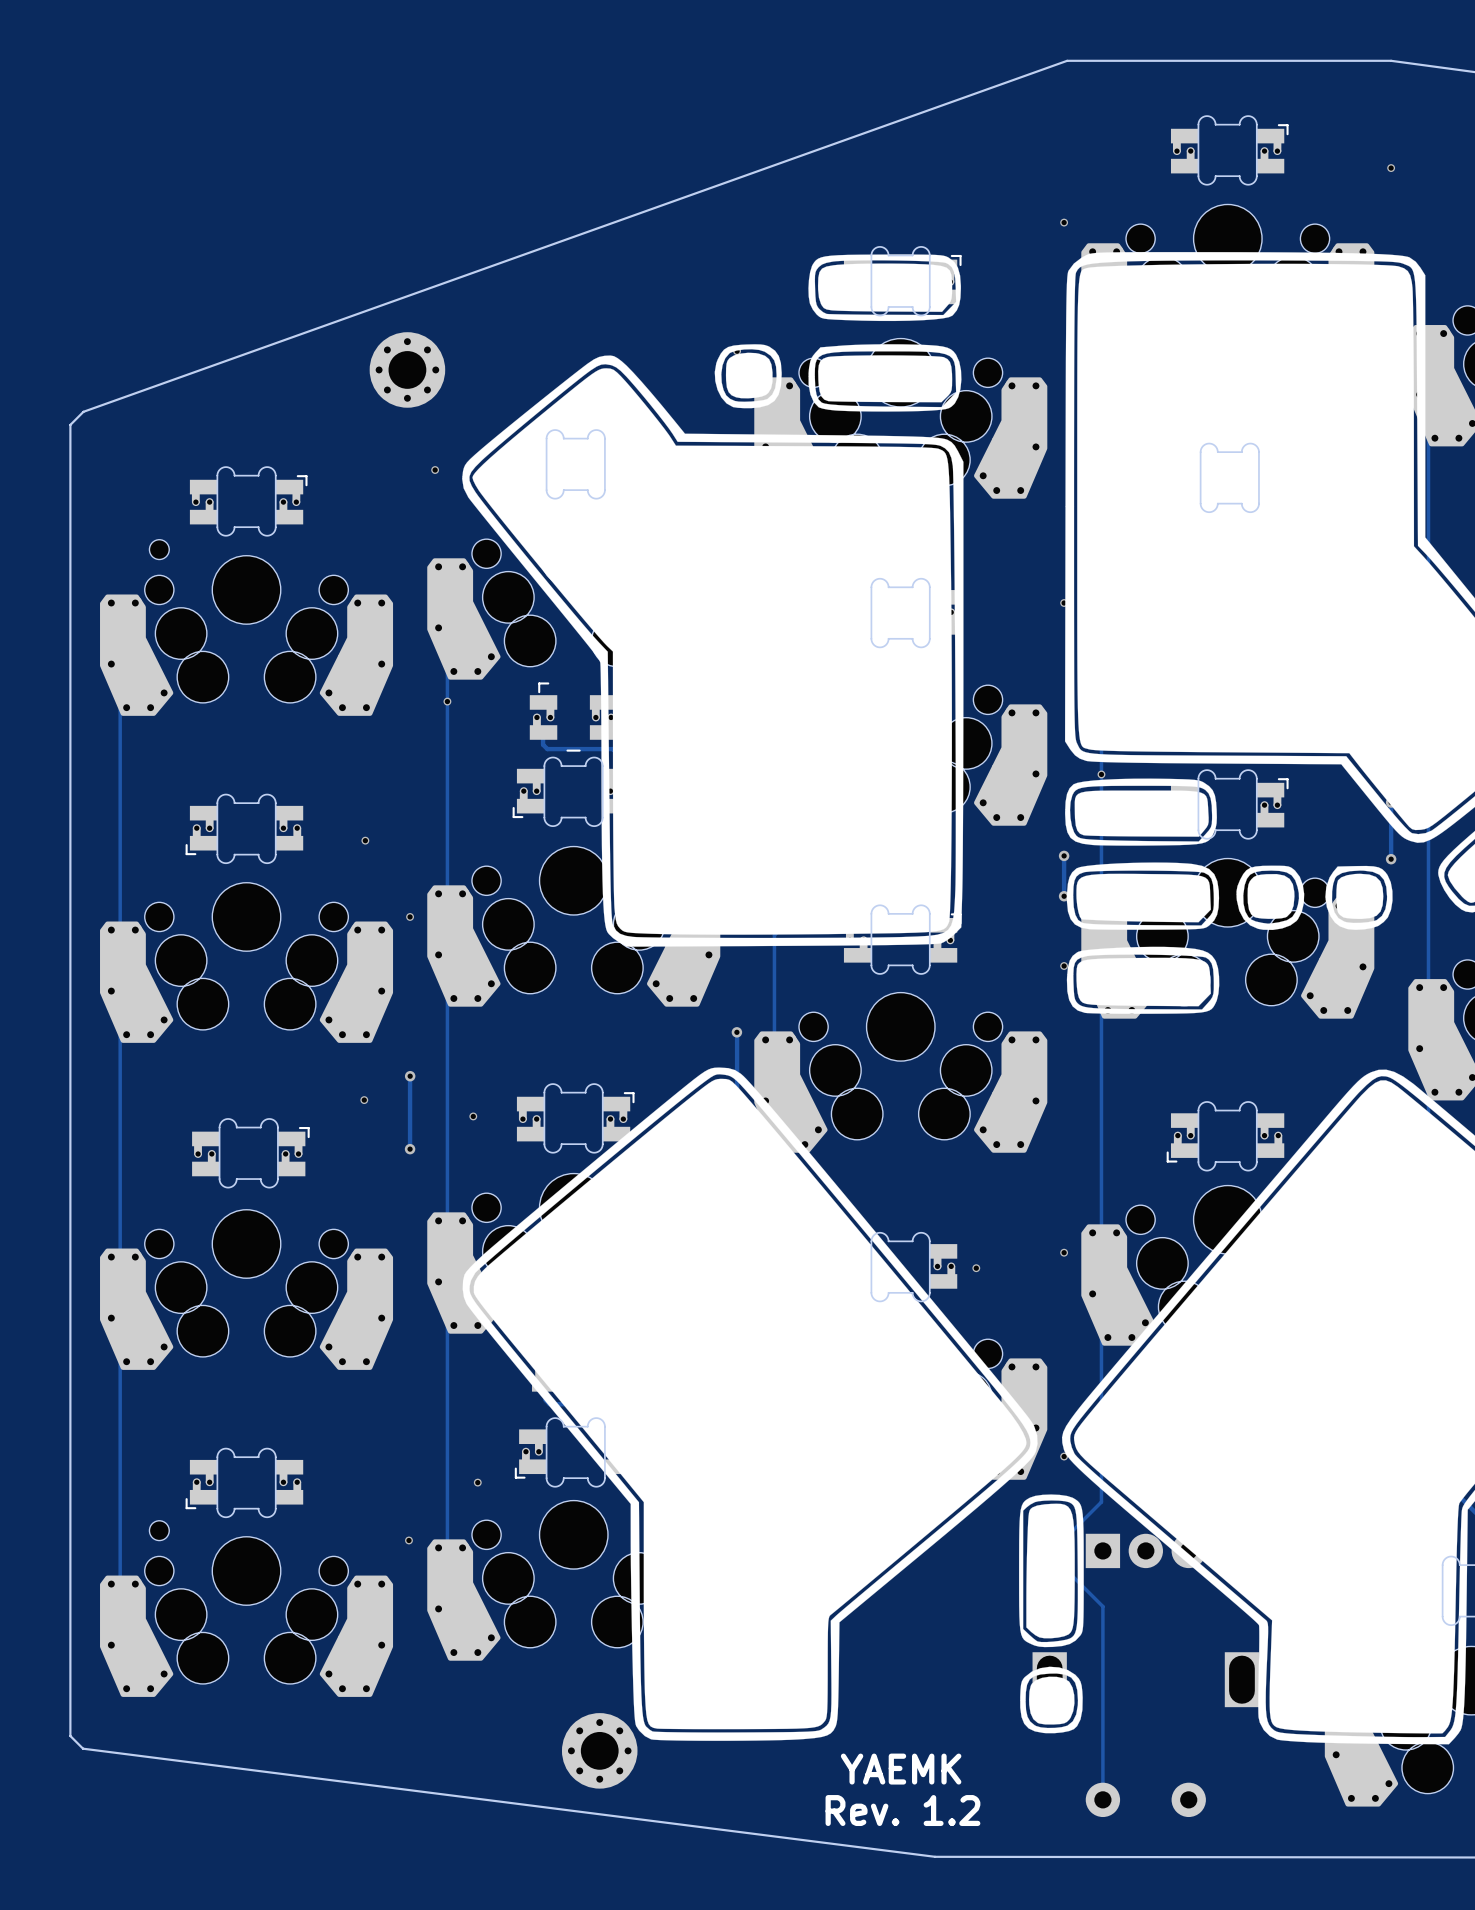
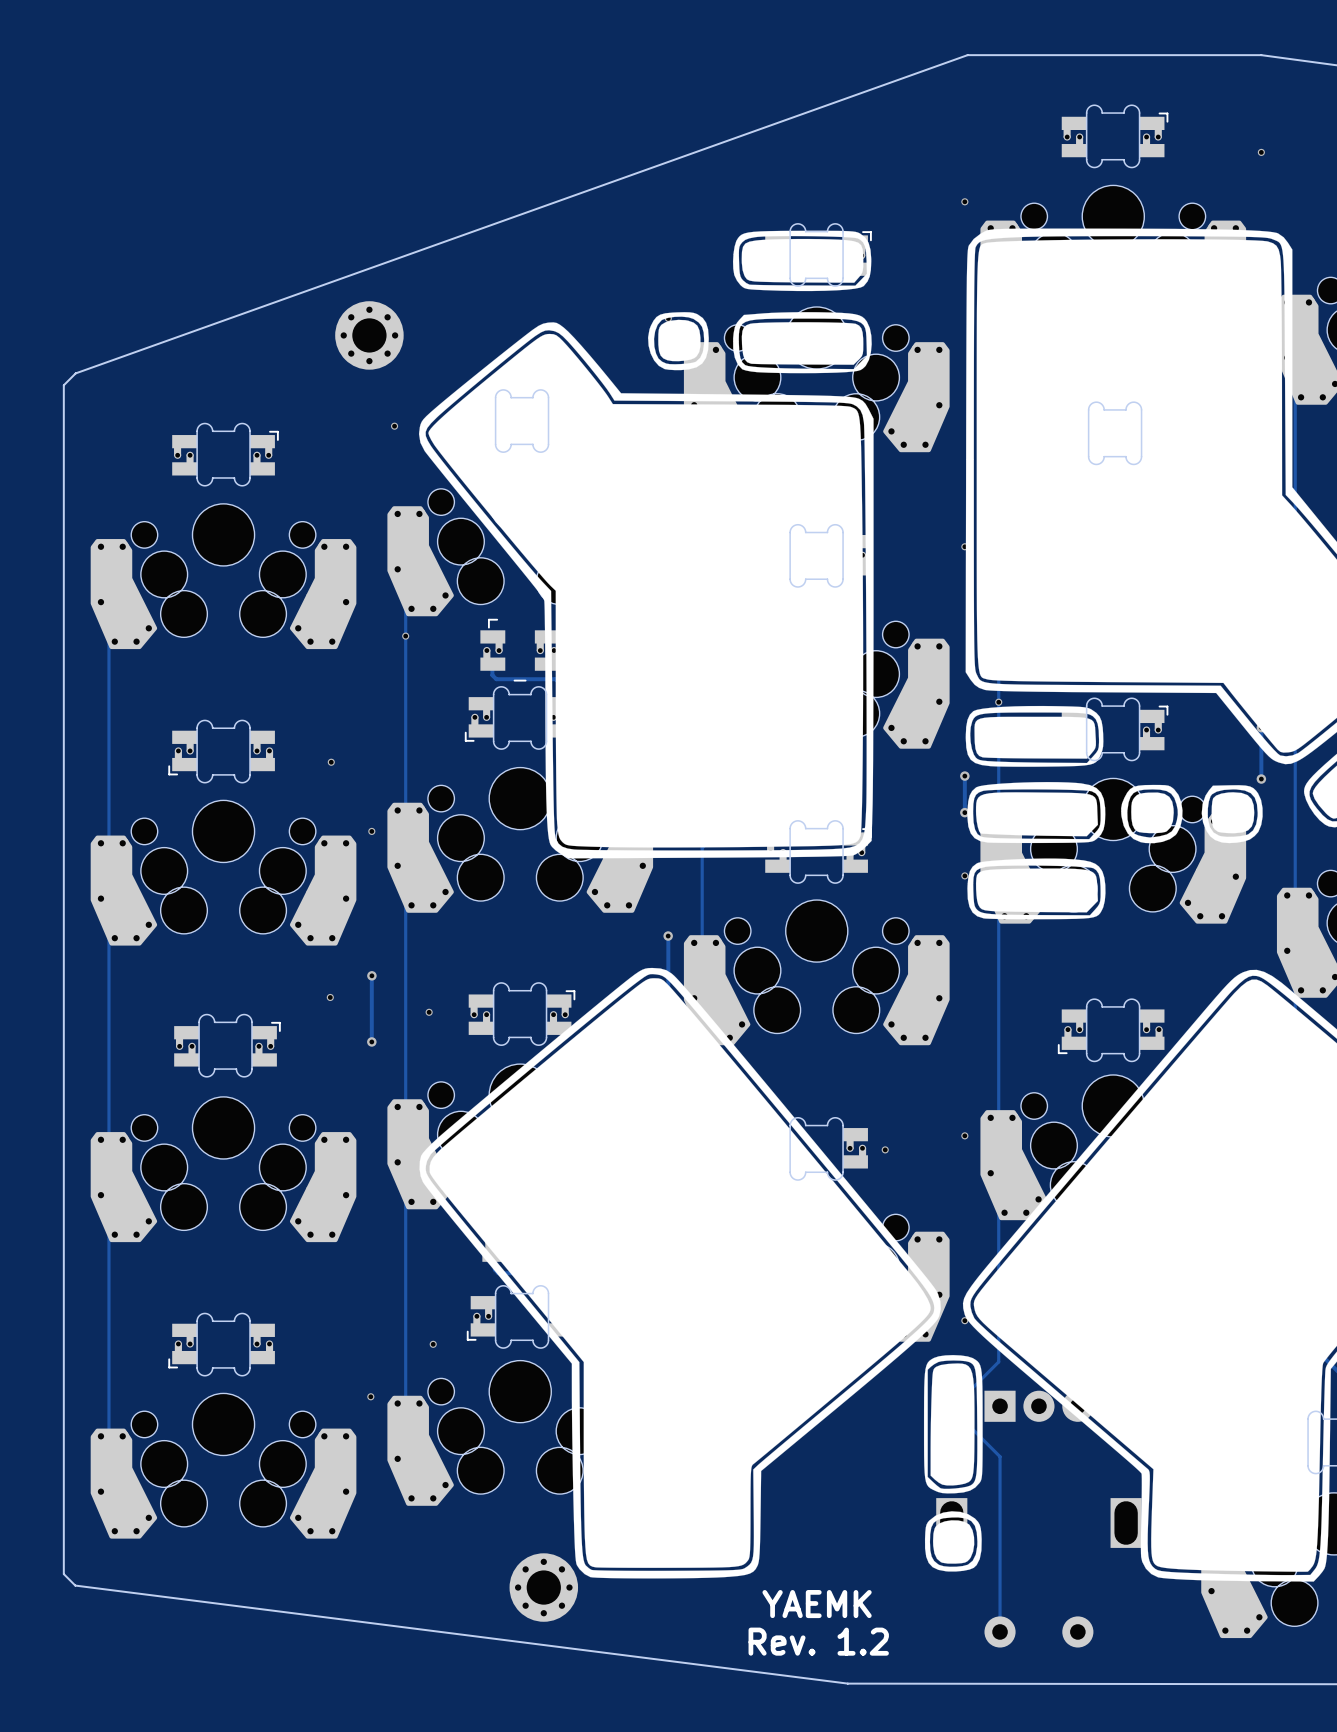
part: (159, 549) -> none
part: (159, 1530) -> none

